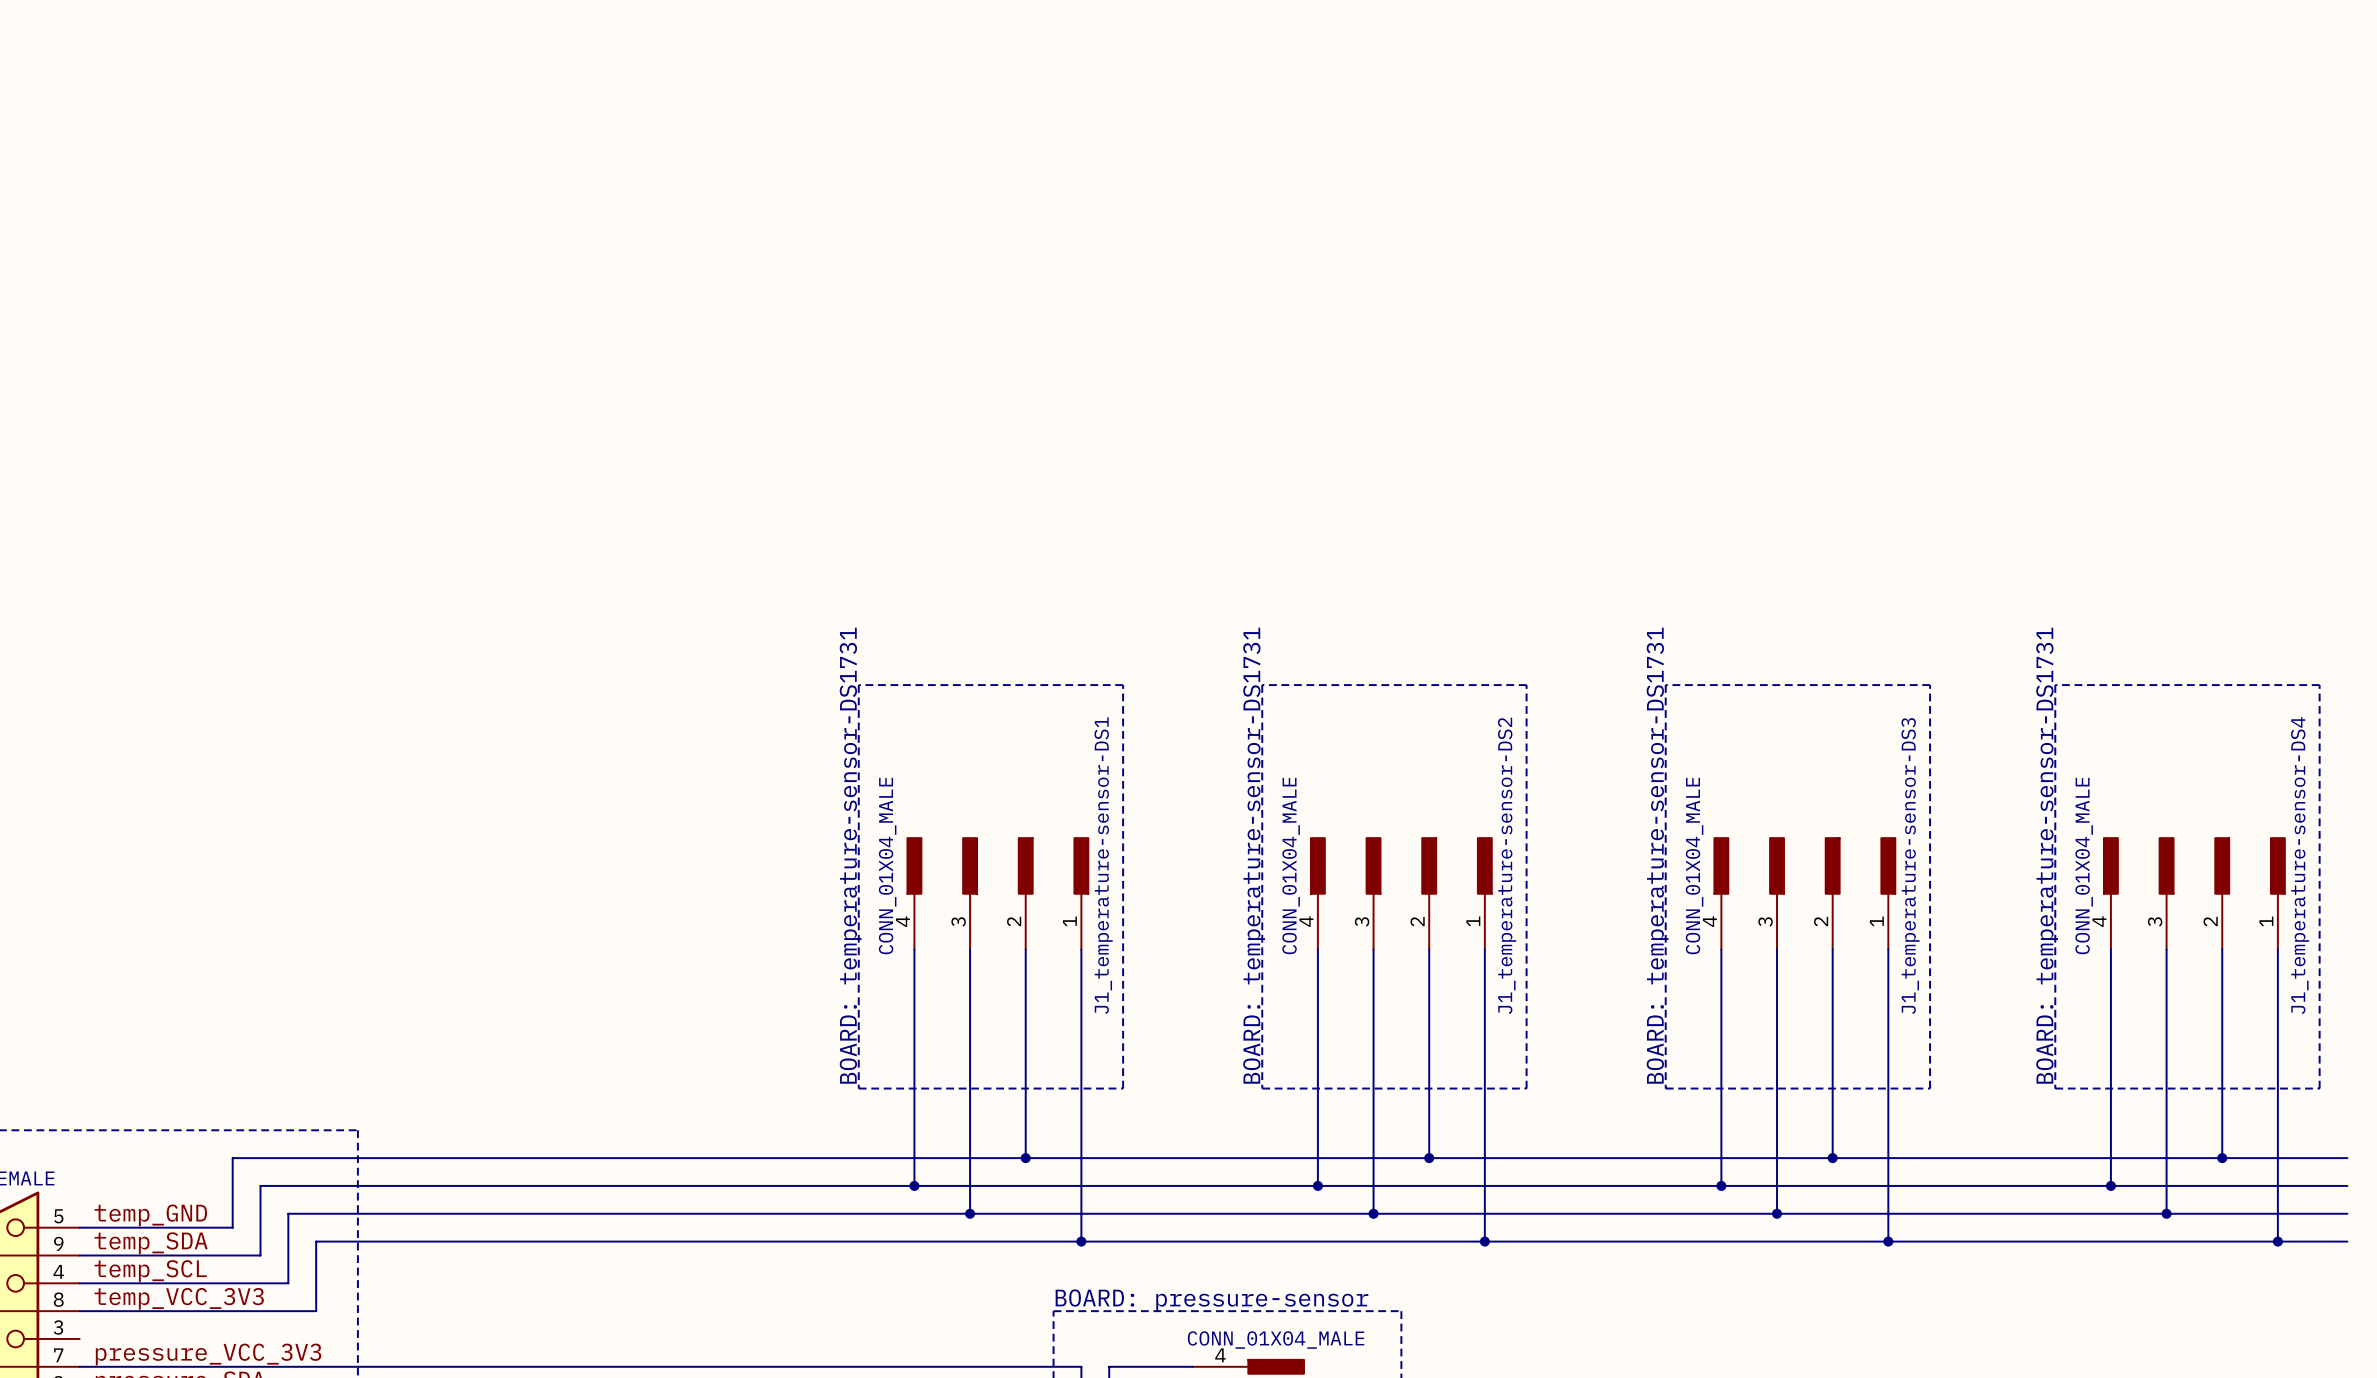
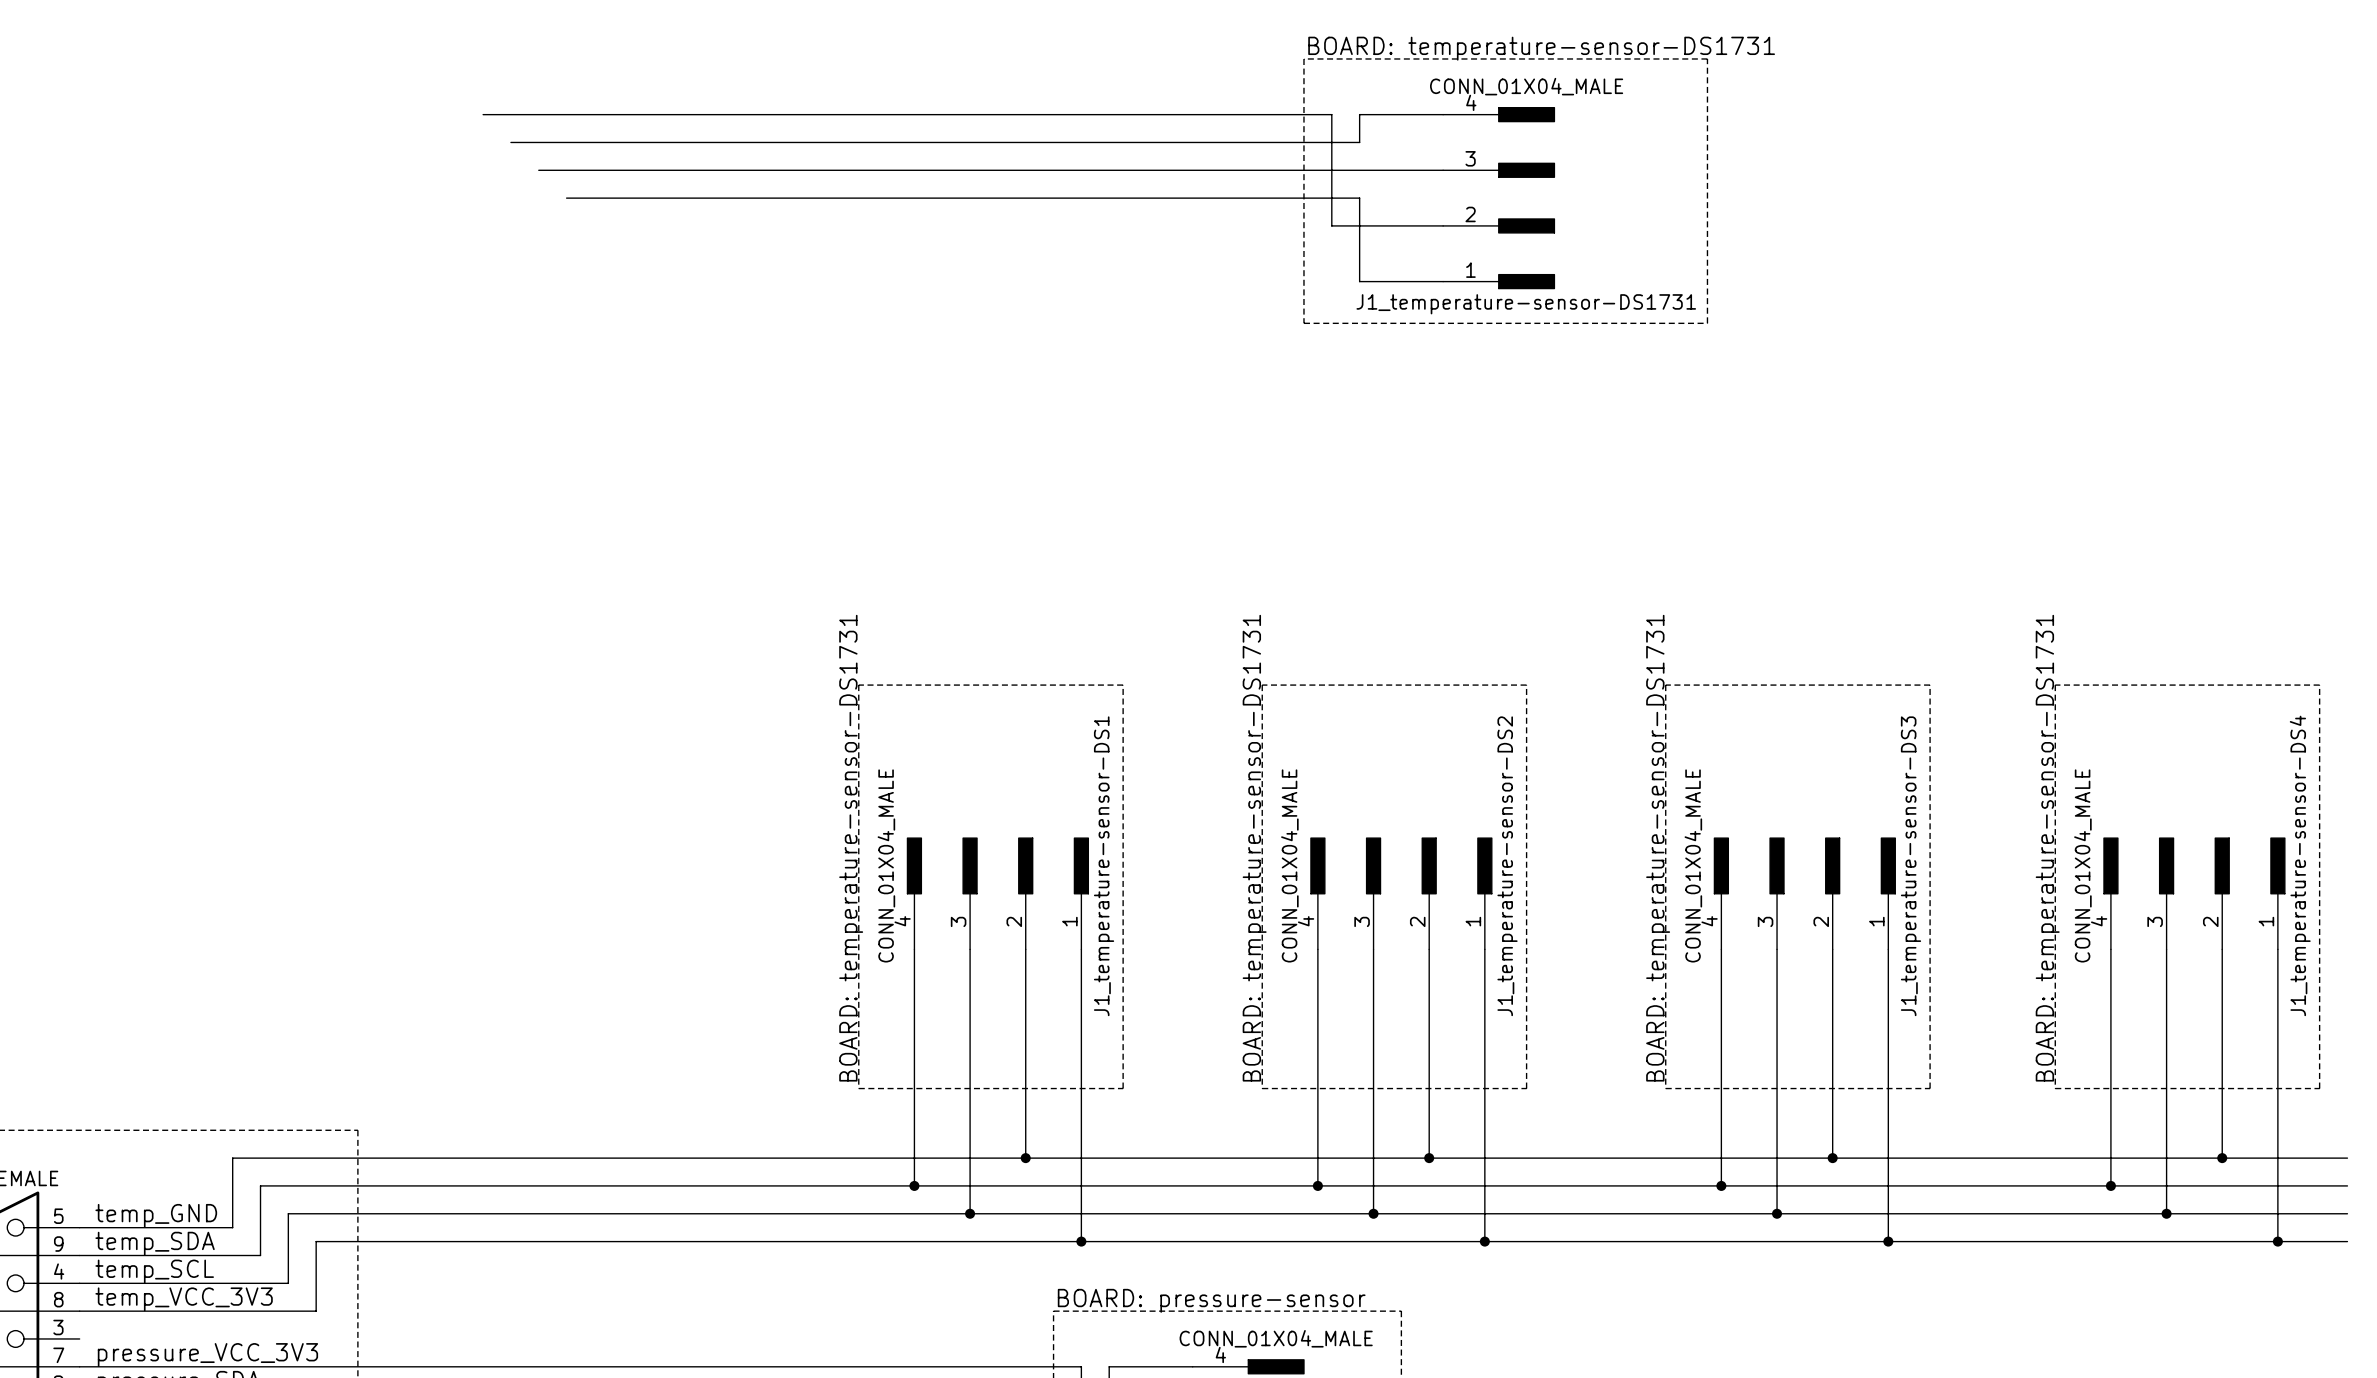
text: none -> BOARD: temperature-sensor-DS1731 (1541, 48)
line: none -> (1303, 58) (1303, 323) (1707, 323) (1707, 58) (1303, 58)
wire: none -> (483, 114) (1331, 114) (1331, 225) (1443, 225)
wire: none -> (1443, 114) (1359, 114) (1359, 142) (510, 142)
wire: none -> (538, 170) (1443, 170)
wire: none -> (566, 198) (1359, 198) (1359, 281) (1443, 281)
J1_temperature-sensor-DS1731: none -> CONN_01X04_MALE (1498, 198)

